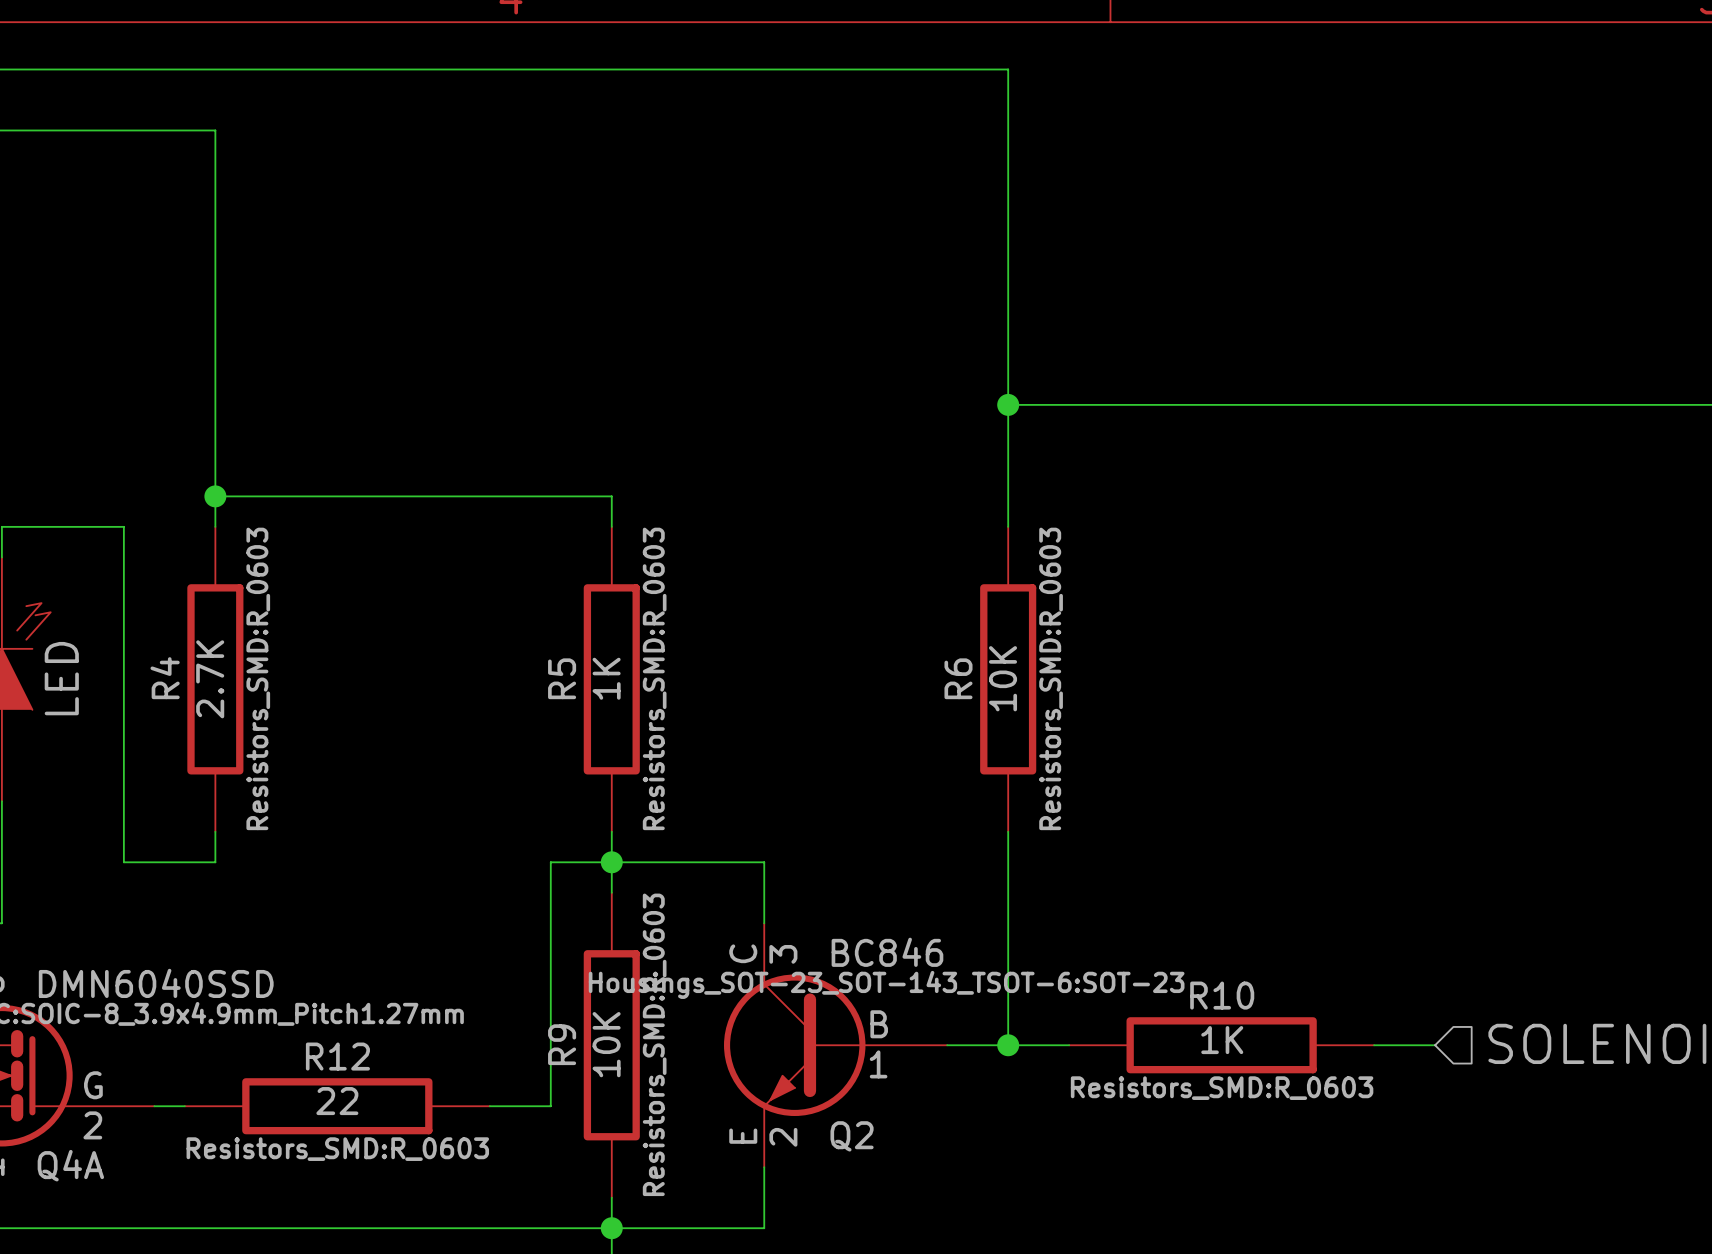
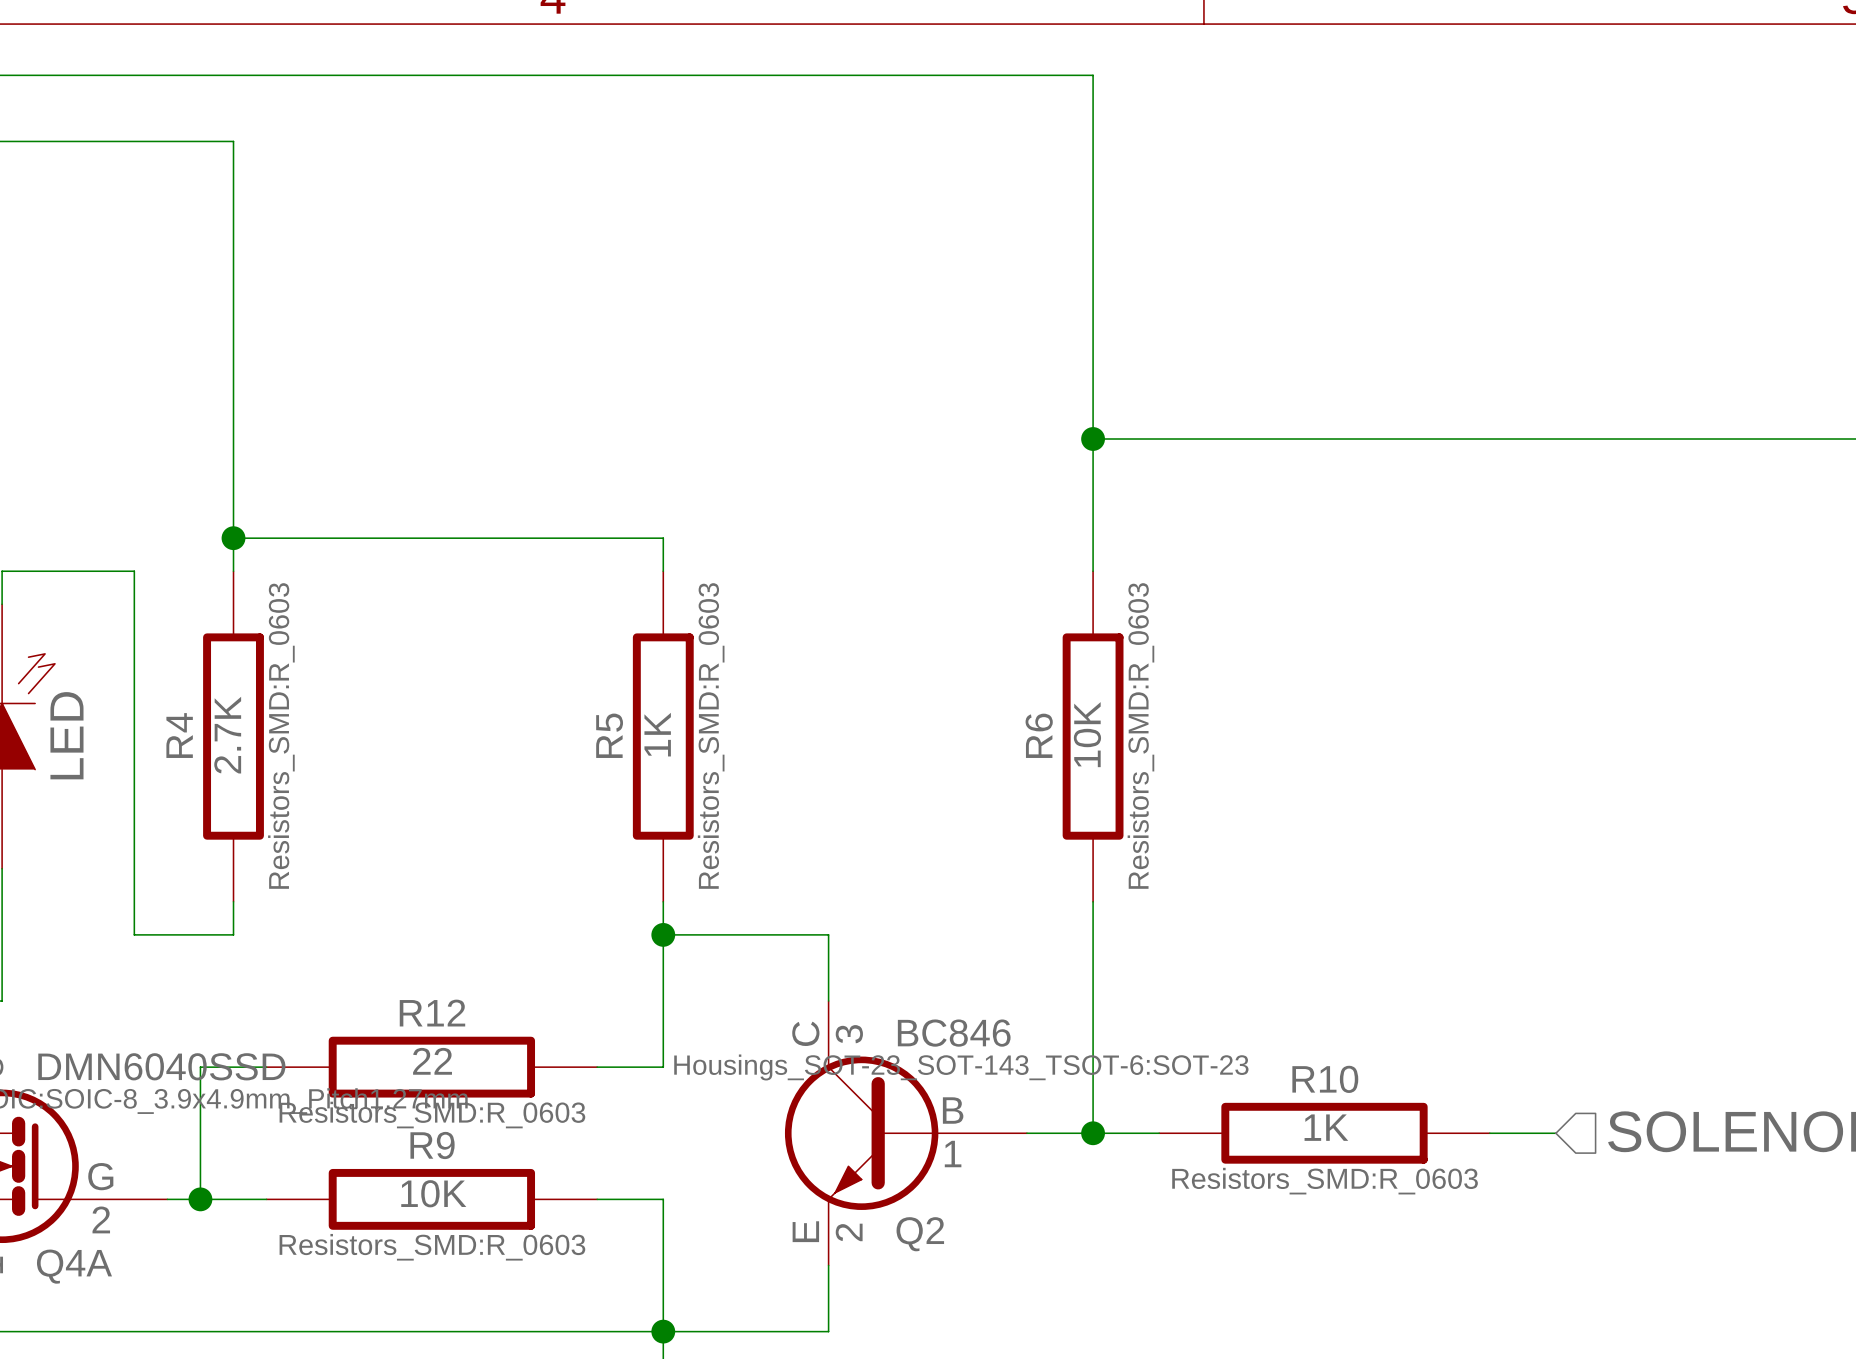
wire: (611, 862) (550, 862) (550, 1106) (489, 1106) -> none
wire: none -> (663, 967) (663, 1067) (597, 1067)
wire: none -> (266, 1067) (200, 1067) (200, 1199) (266, 1199)
R9 rotation: 0° (611, 1045) -> 90° clockwise (431, 1199)
R9 position: (611, 1045) -> (431, 1199)
junction: none -> (200, 1199)
R12 position: (337, 1106) -> (431, 1067)
wire: none -> (597, 1199) (663, 1199) (663, 1298)

